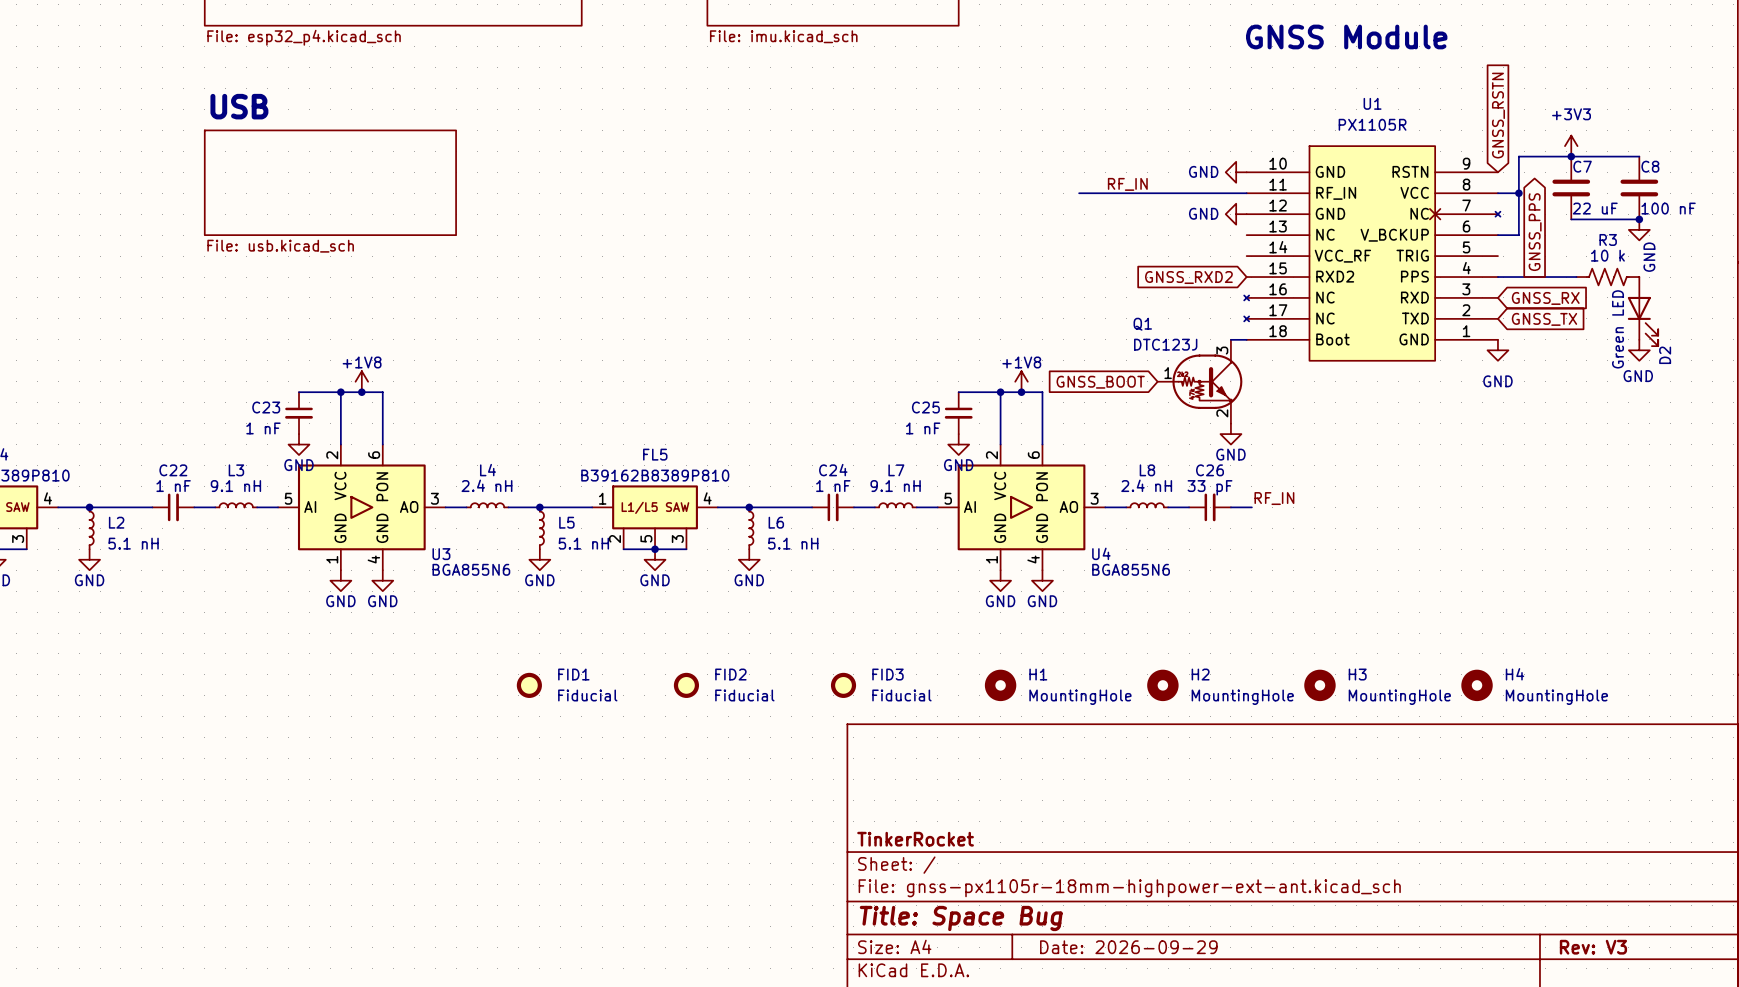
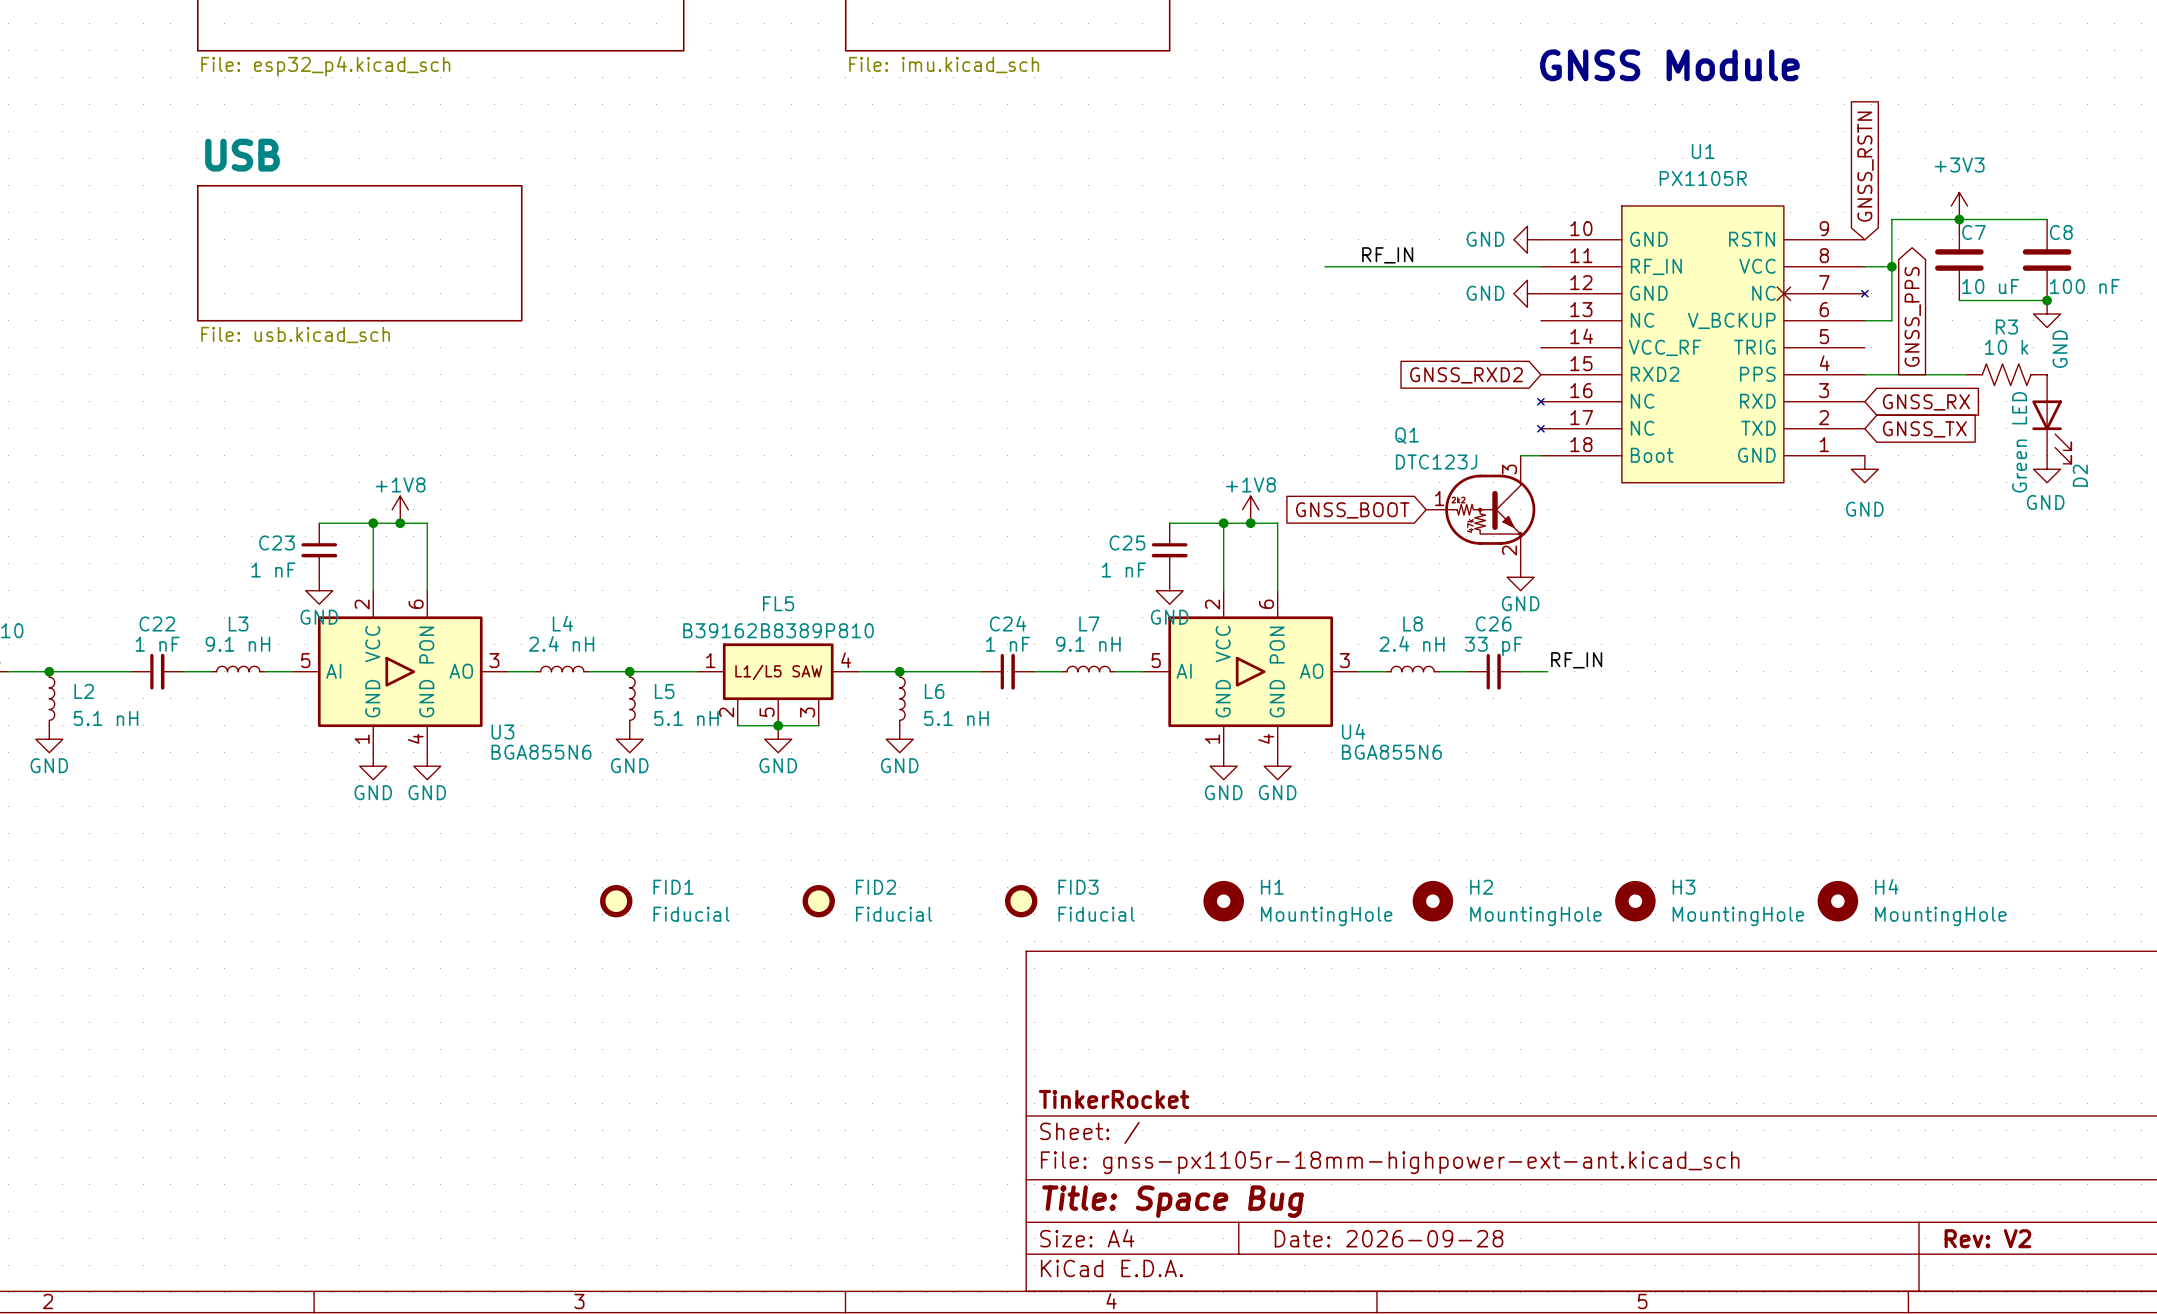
C7 value: 22 uF (1595, 208) -> 10 uF (1990, 286)
title block: Date: 2026-09-29 (1128, 947) -> Date: 2026-09-28 (1389, 1238)
title block: Rev: V3 (1593, 947) -> Rev: V2 (1987, 1238)

